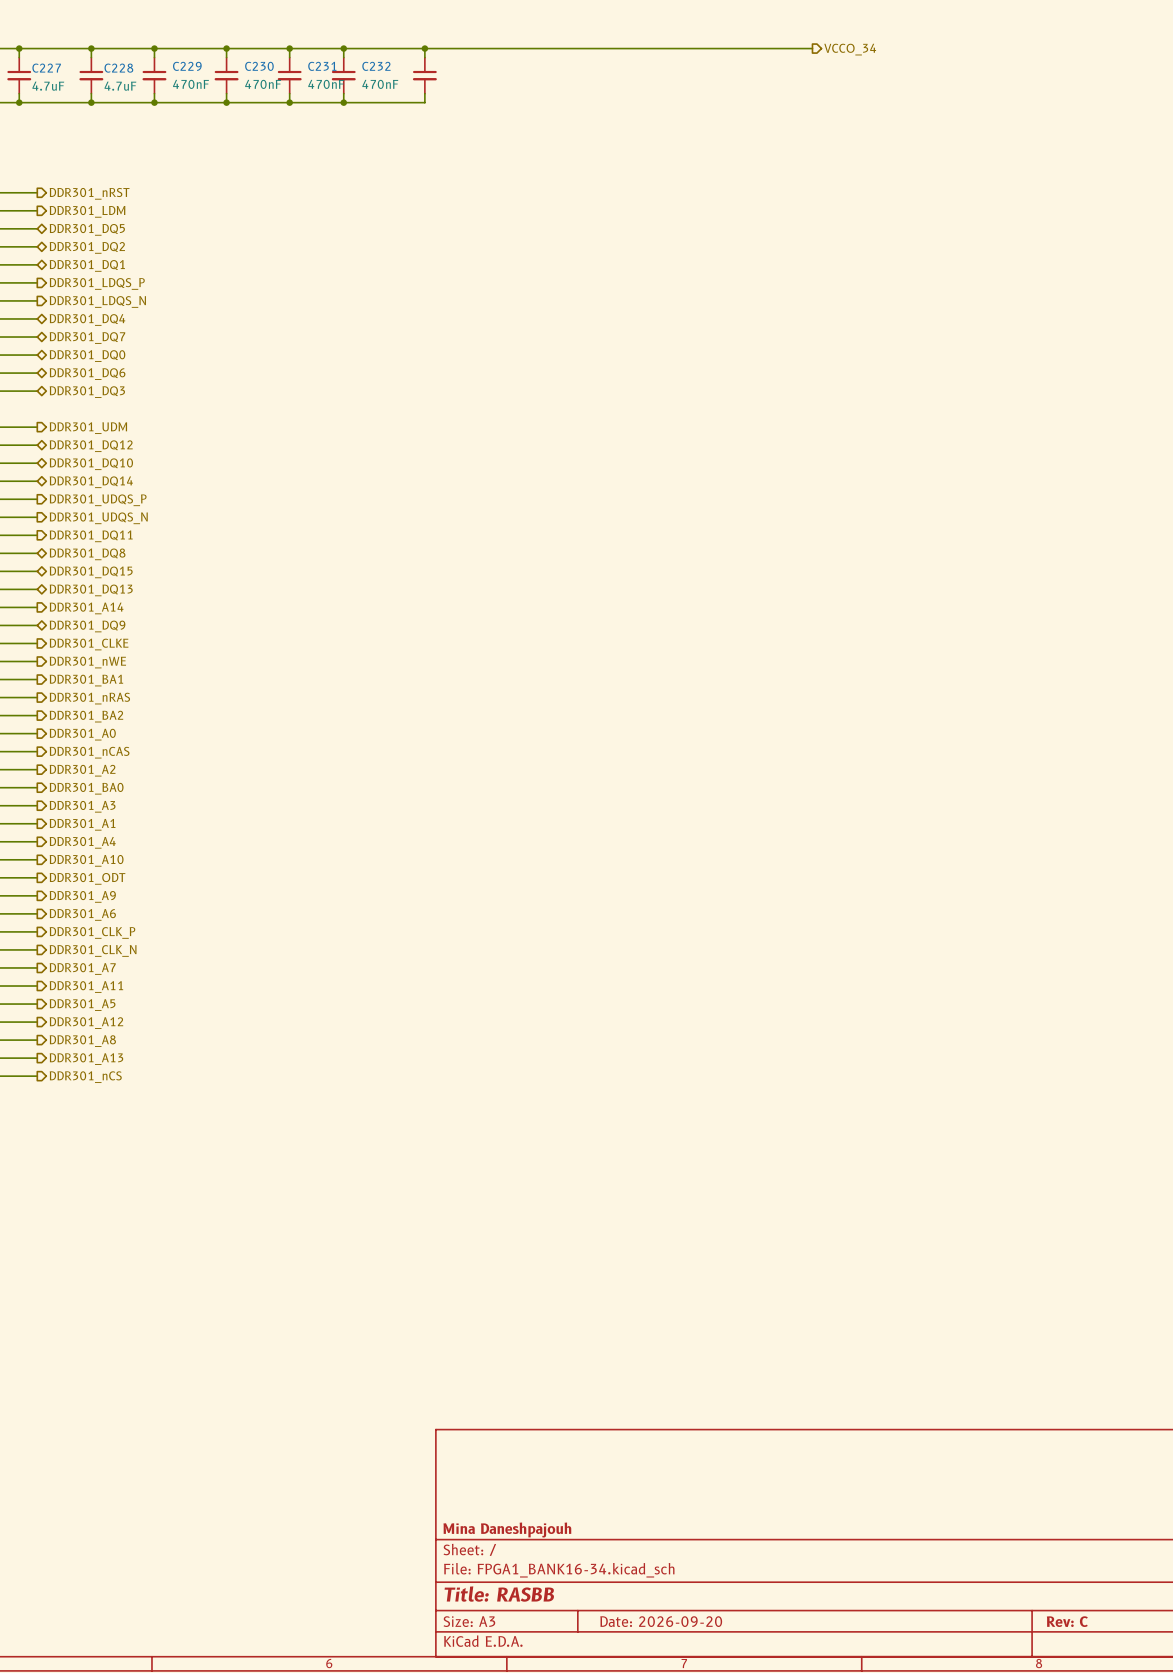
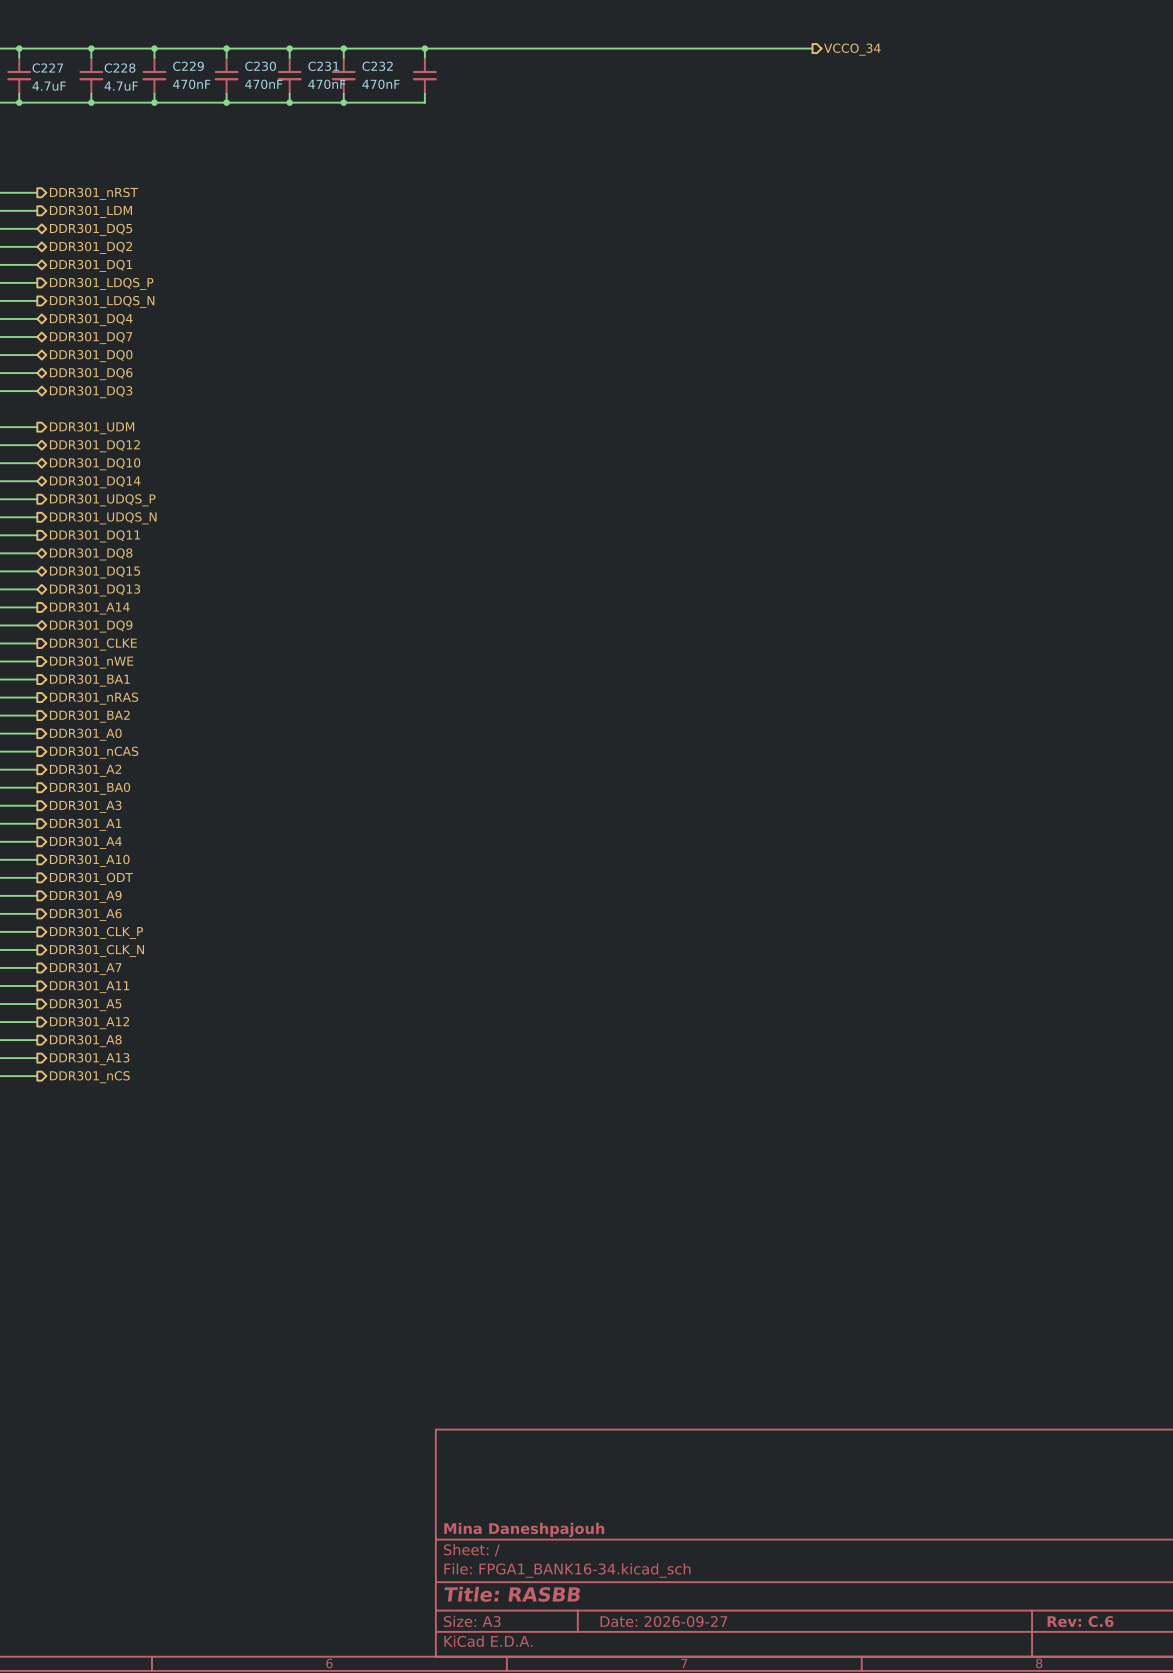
title block: Date: 2026-09-20 (661, 1621) -> Date: 2026-09-27 (663, 1621)
title block: Rev: C (1067, 1621) -> Rev: C.6 (1080, 1621)

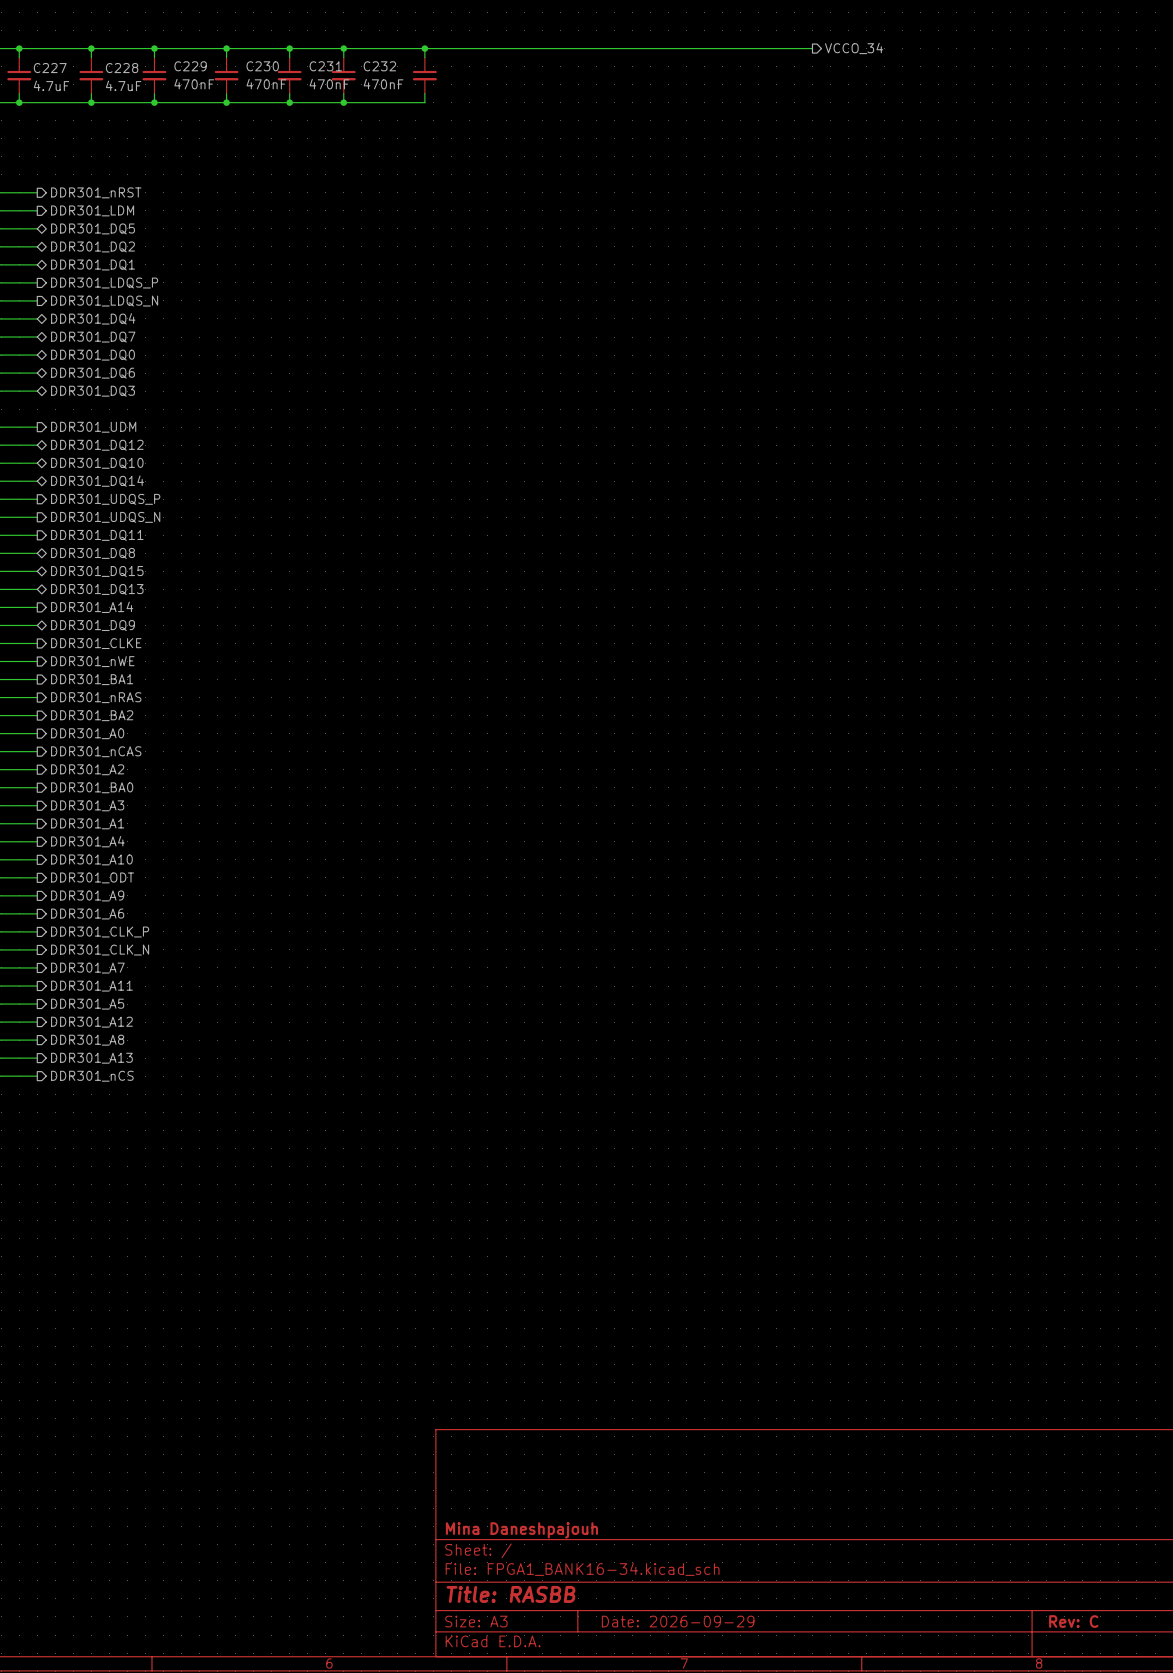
title block: Date: 2026-09-27 (663, 1621) -> Date: 2026-09-29 (678, 1621)
title block: Rev: C.6 (1080, 1621) -> Rev: C (1073, 1621)

